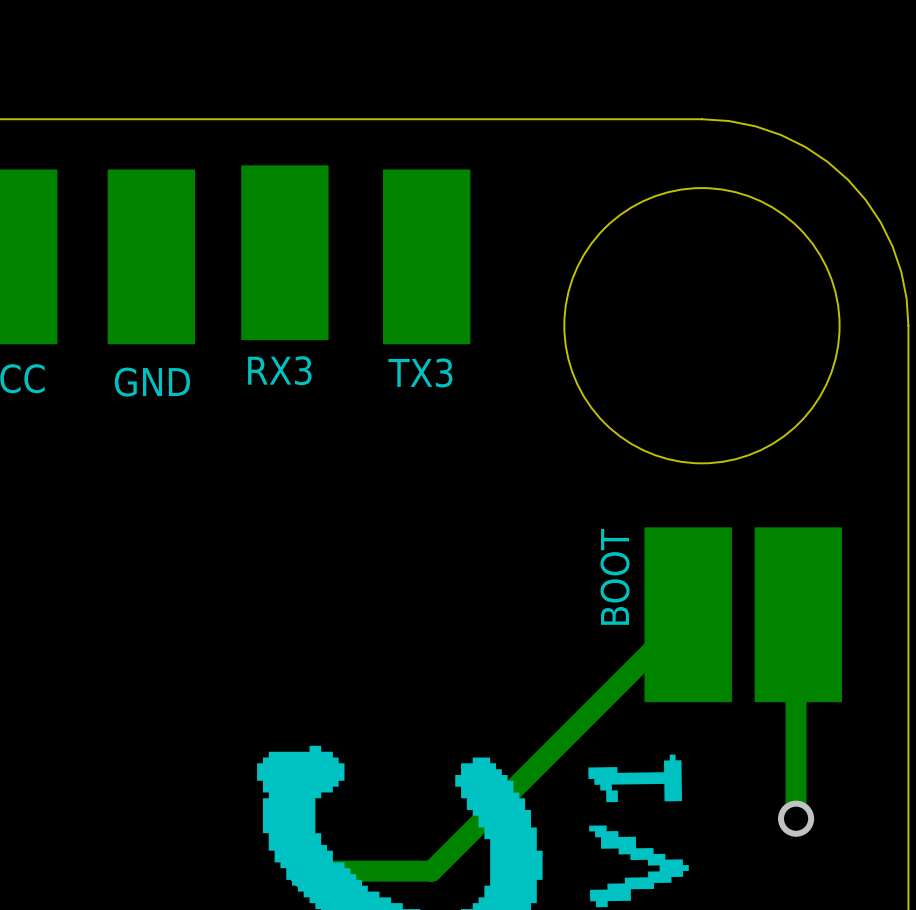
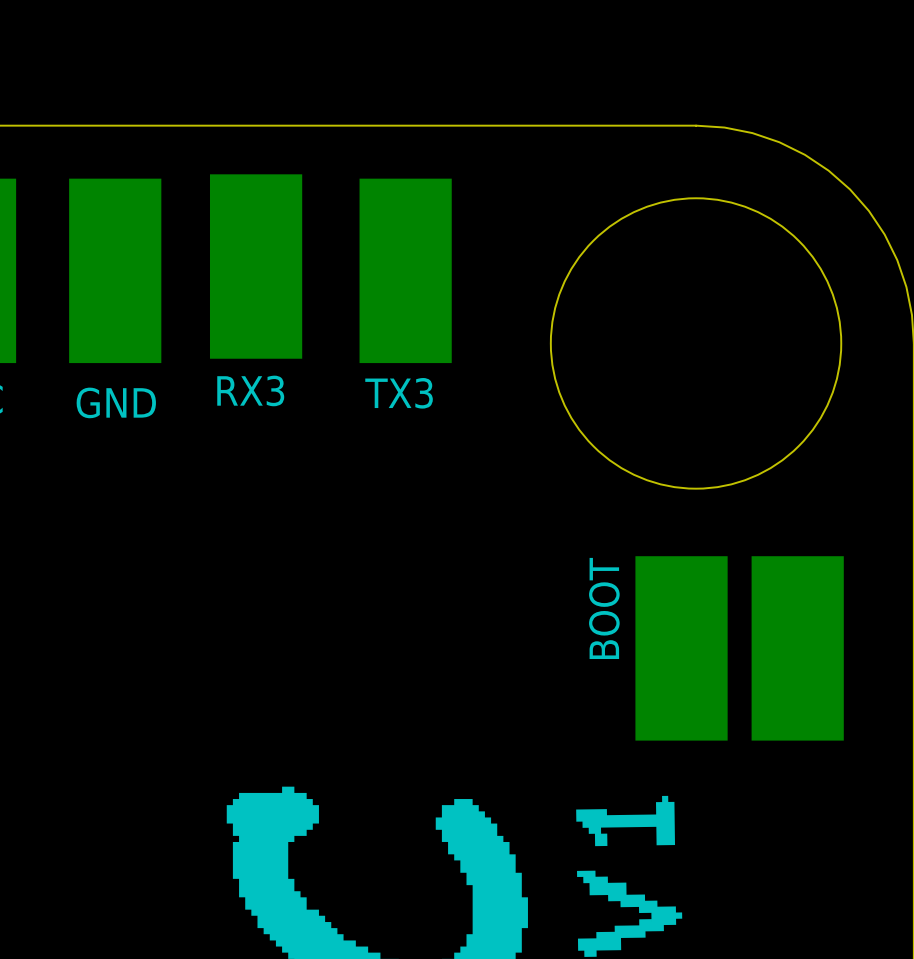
track: (688, 614) (431, 871) (306, 871) -> none
track: (798, 614) (796, 616) (796, 818) -> none
via: (796, 818) -> none

